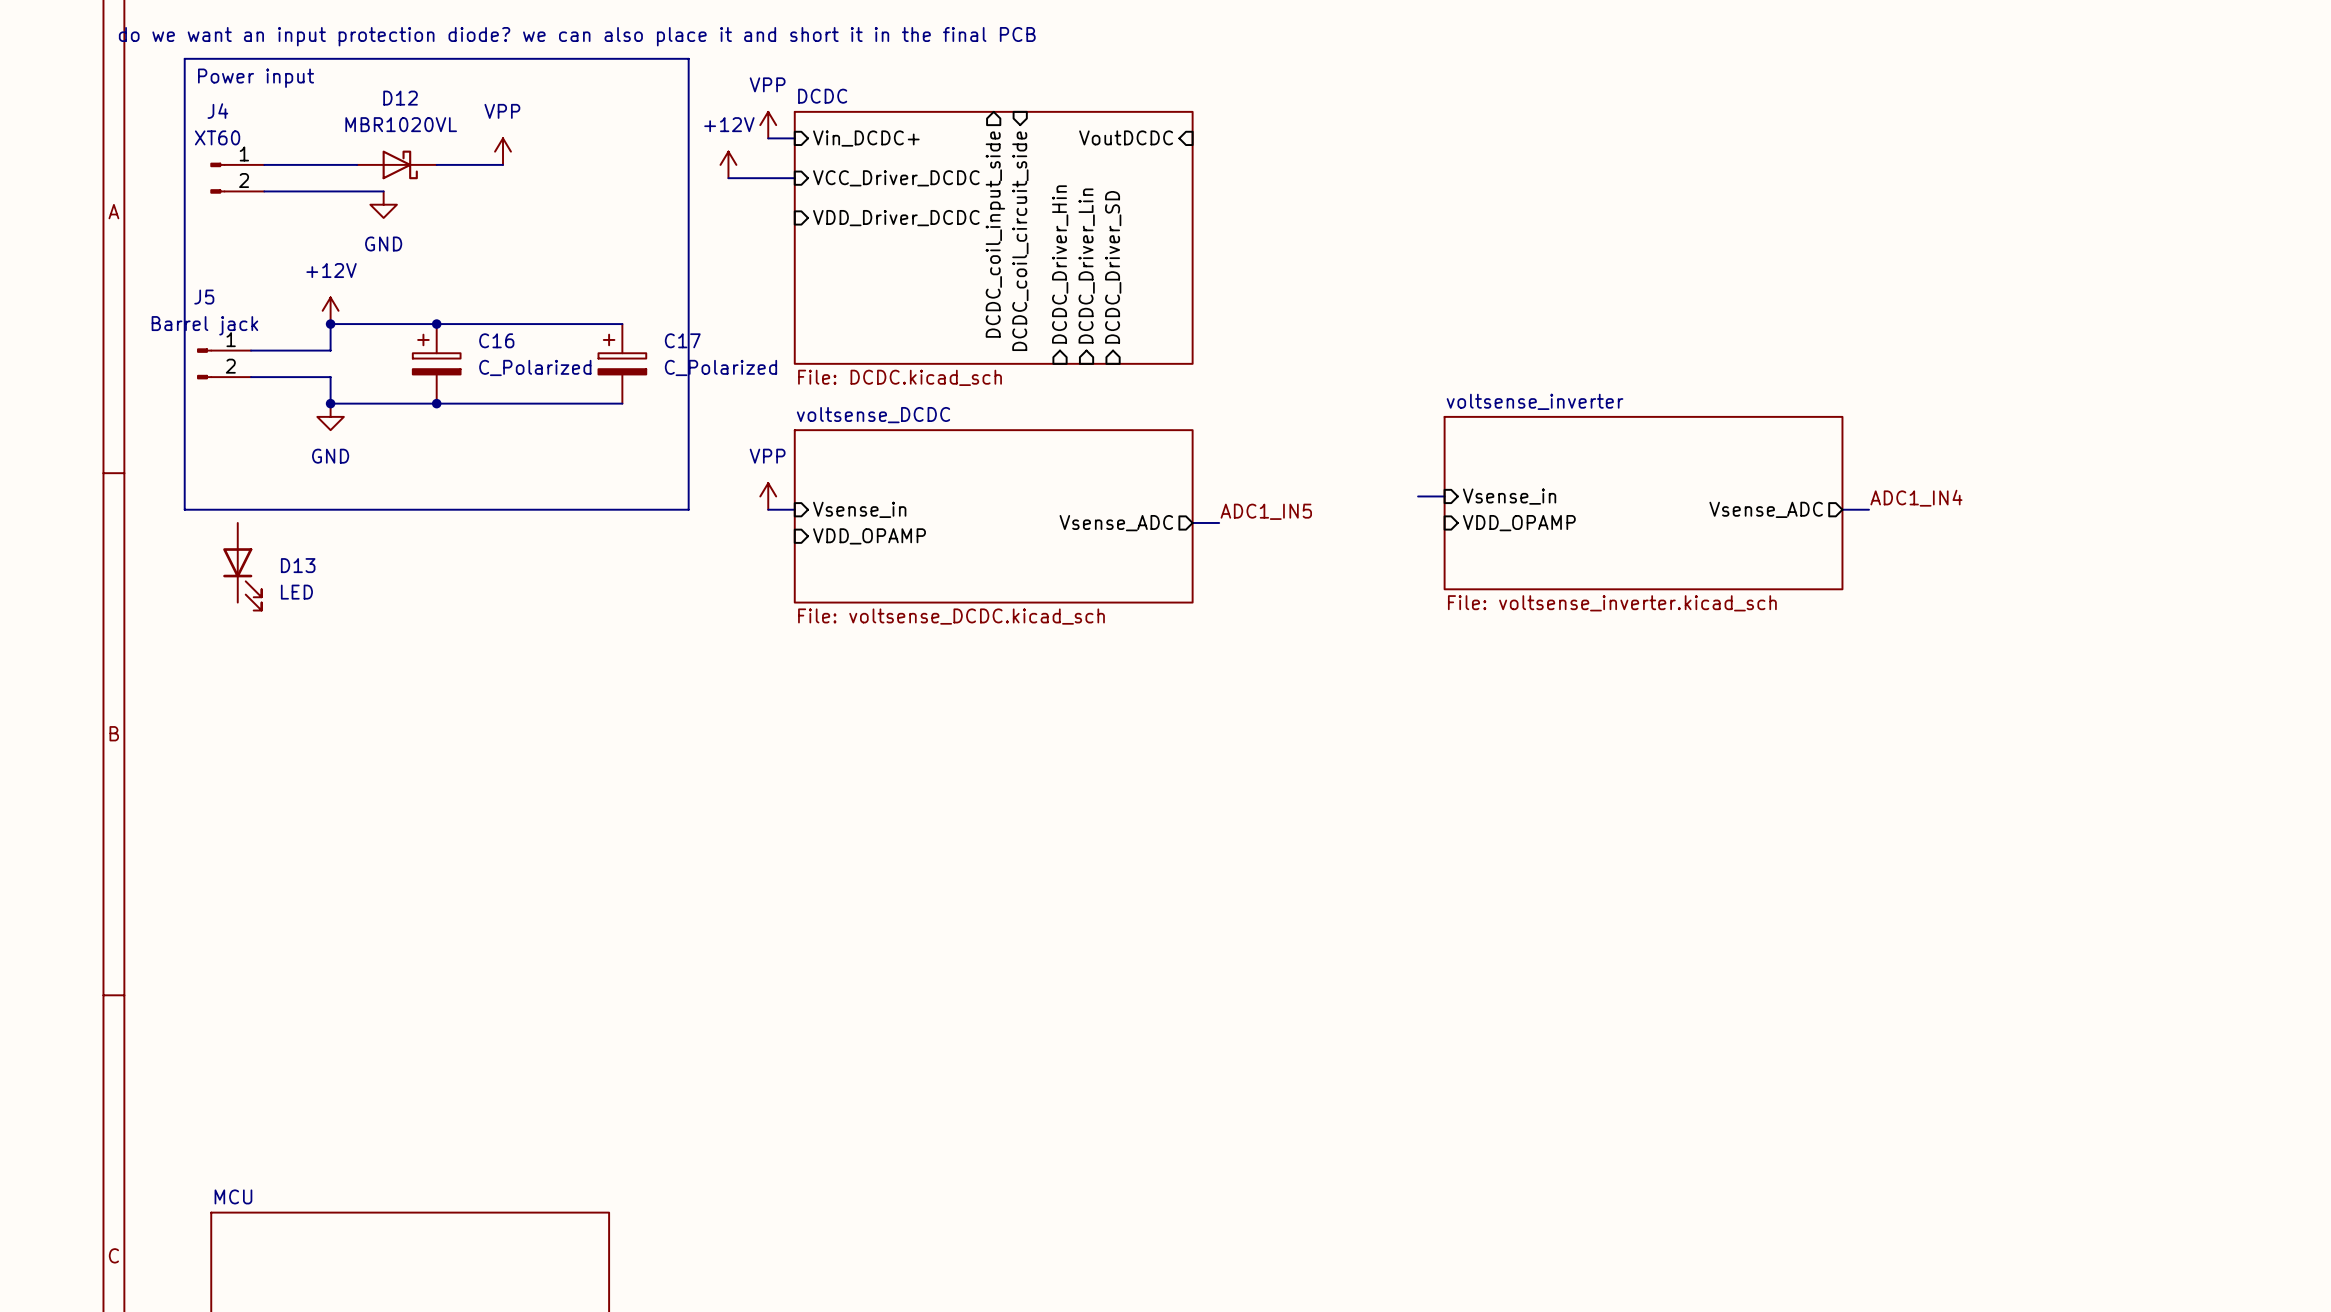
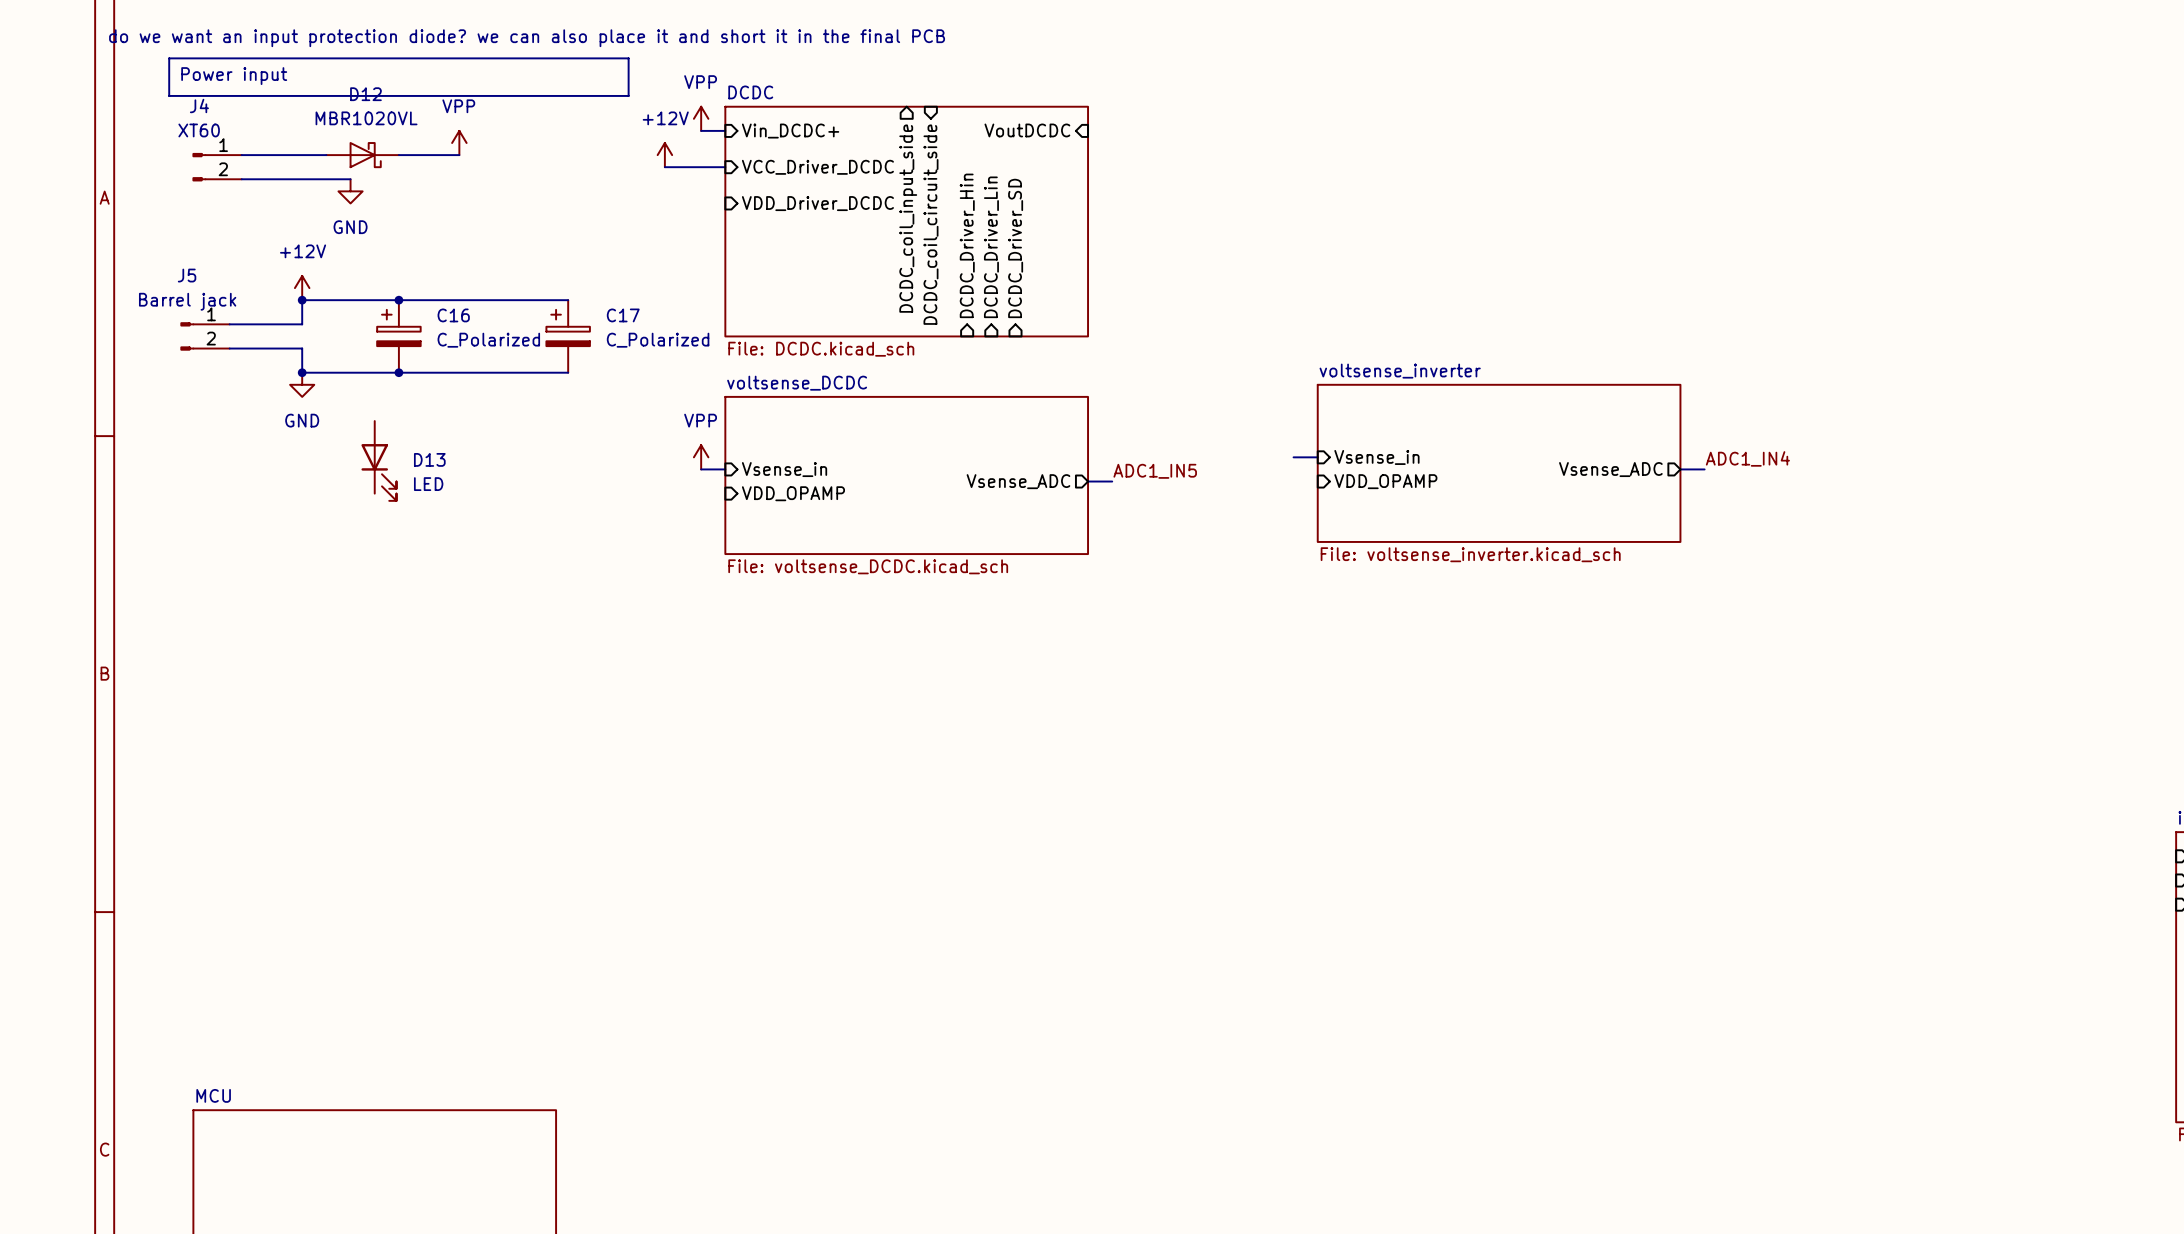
line: (184, 100) (184, 509) (688, 509) (688, 100) -> (169, 95) (628, 95)
D13 position: (242, 566) -> (378, 460)

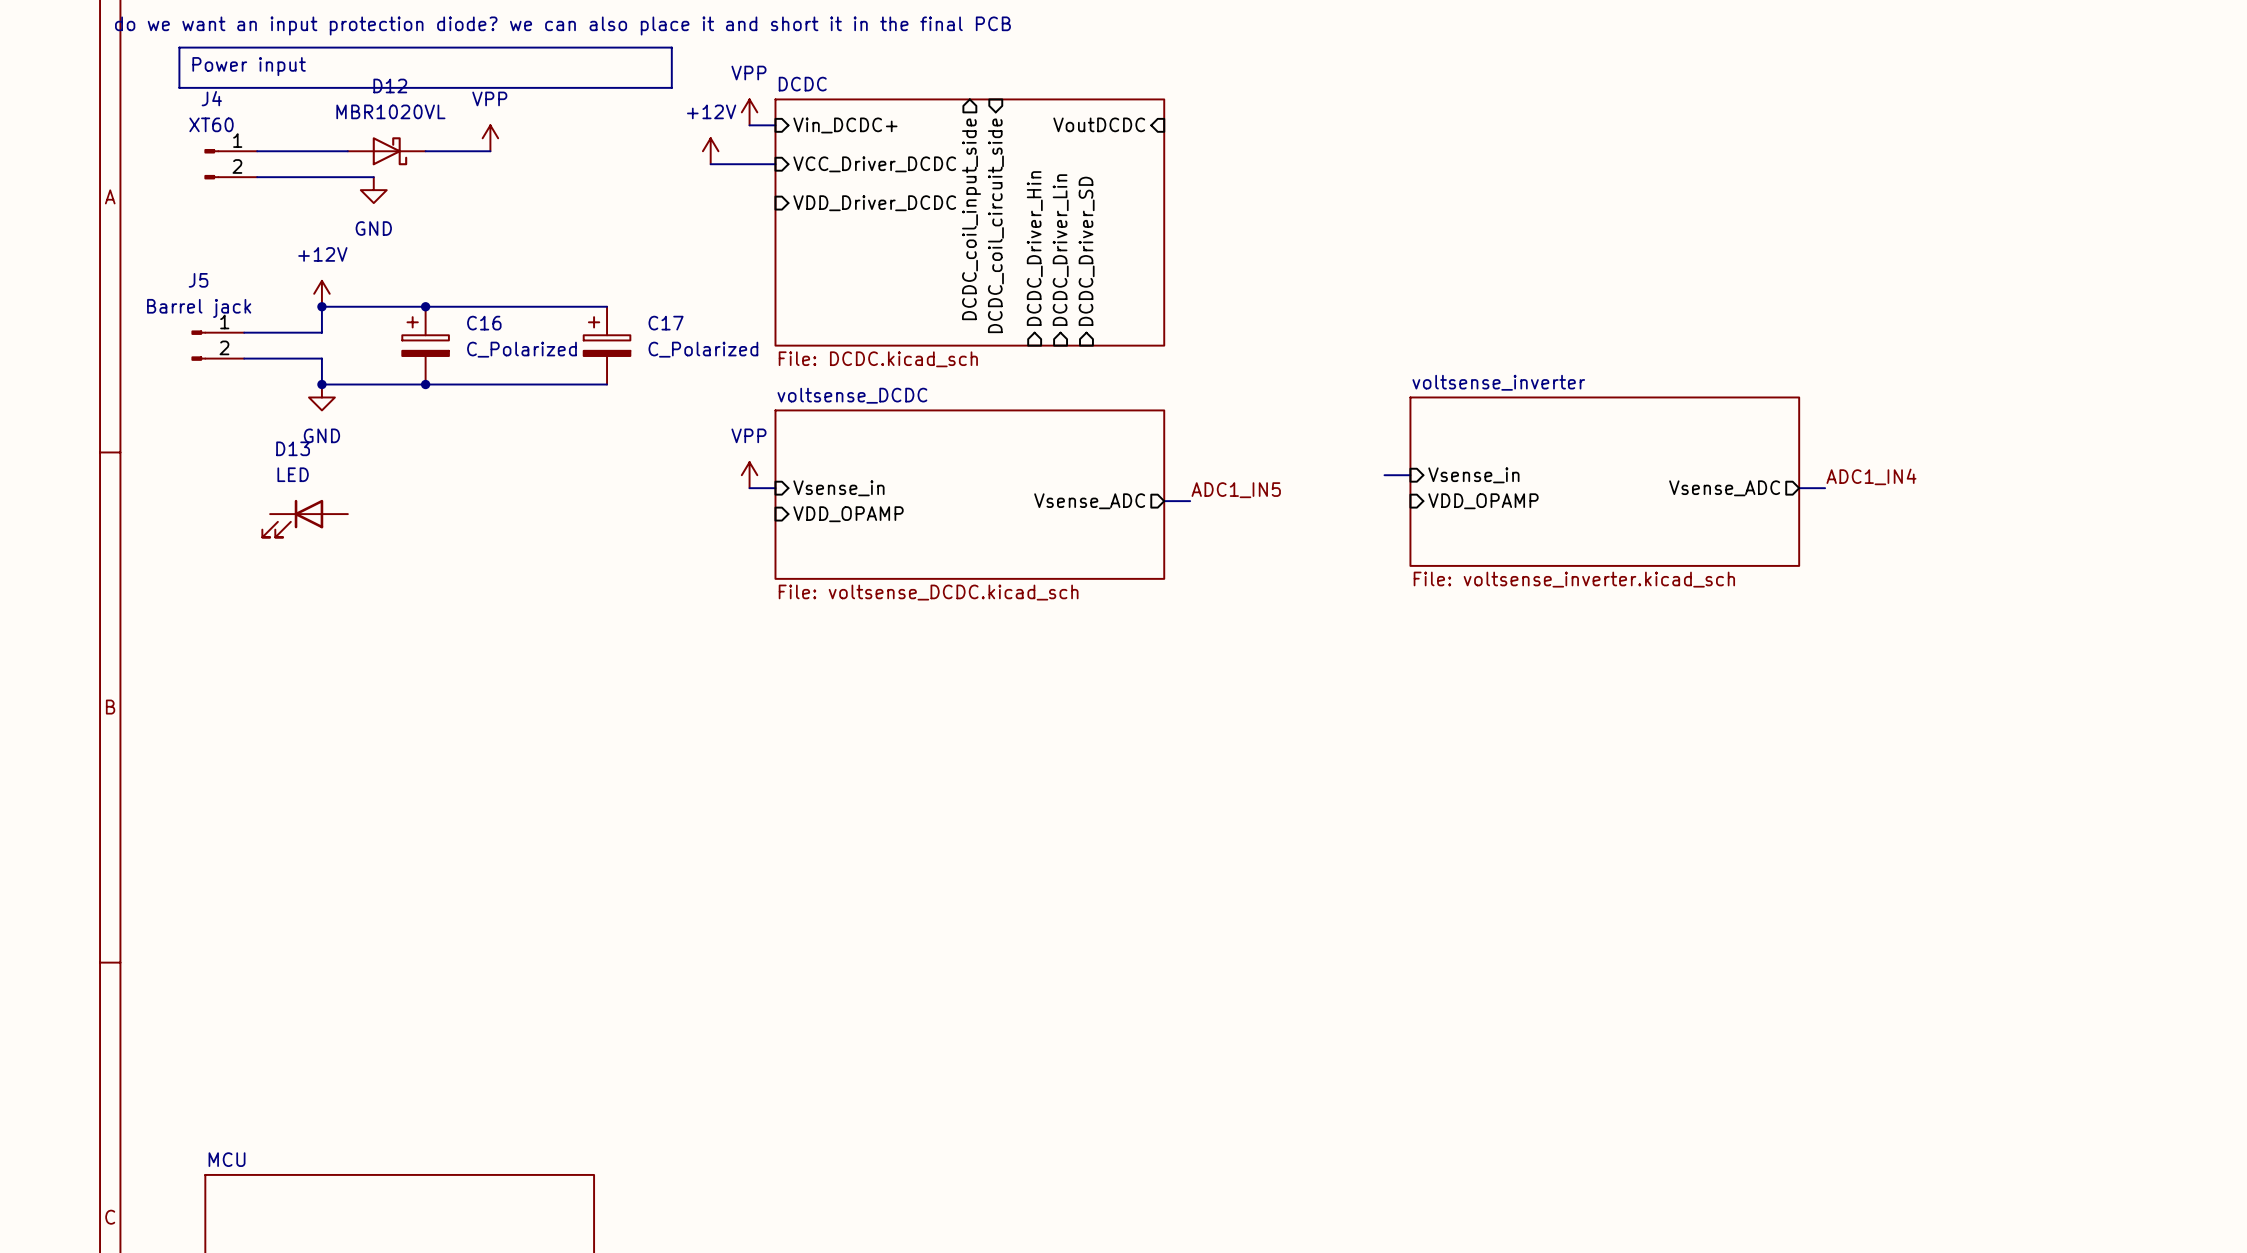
D13 name position: D13 (429, 459) -> D13 (293, 448)
D13 position: (378, 460) -> (305, 518)
D13 rotation: 0° (378, 472) -> 90° clockwise (292, 518)
D13 value position: LED (428, 484) -> LED (293, 474)

